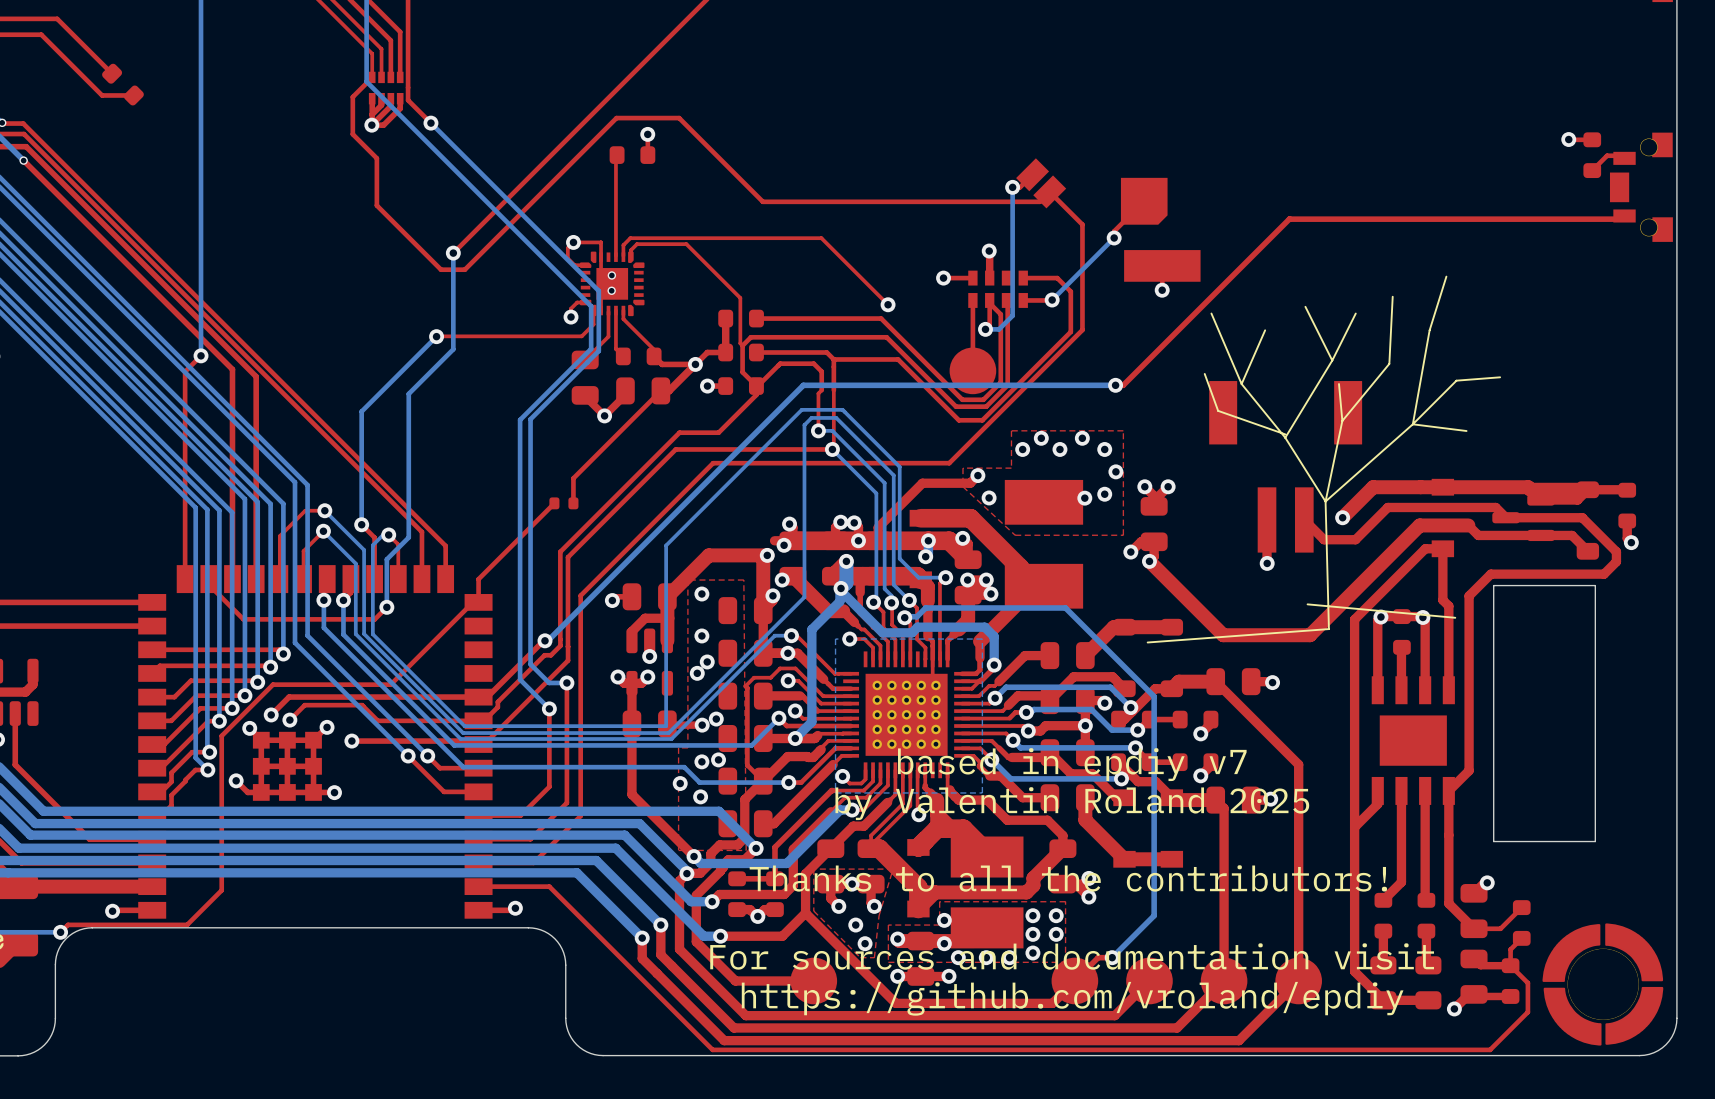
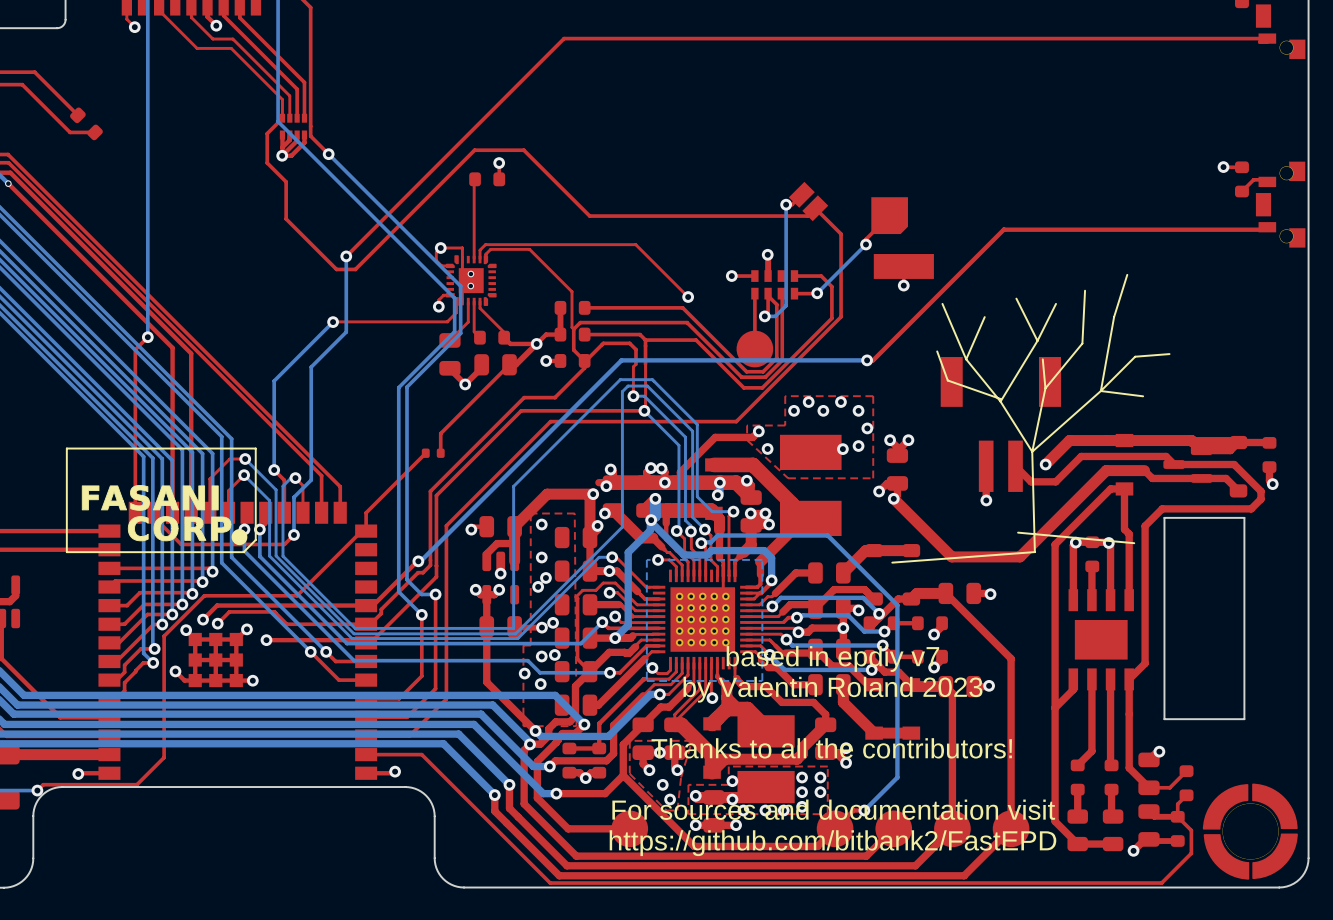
line: none -> (255, 448) (255, 539) (243, 552) (66, 552) (66, 448) (255, 448)
drawing: none -> [81, 485, 248, 546]
text: by Valentin Roland 2025 (1072, 803) -> by Valentin Roland 2023 (832, 689)
text: https://github.com/vroland/epdiy (1072, 998) -> https://github.com/bitbank2/FastEPD (833, 843)

